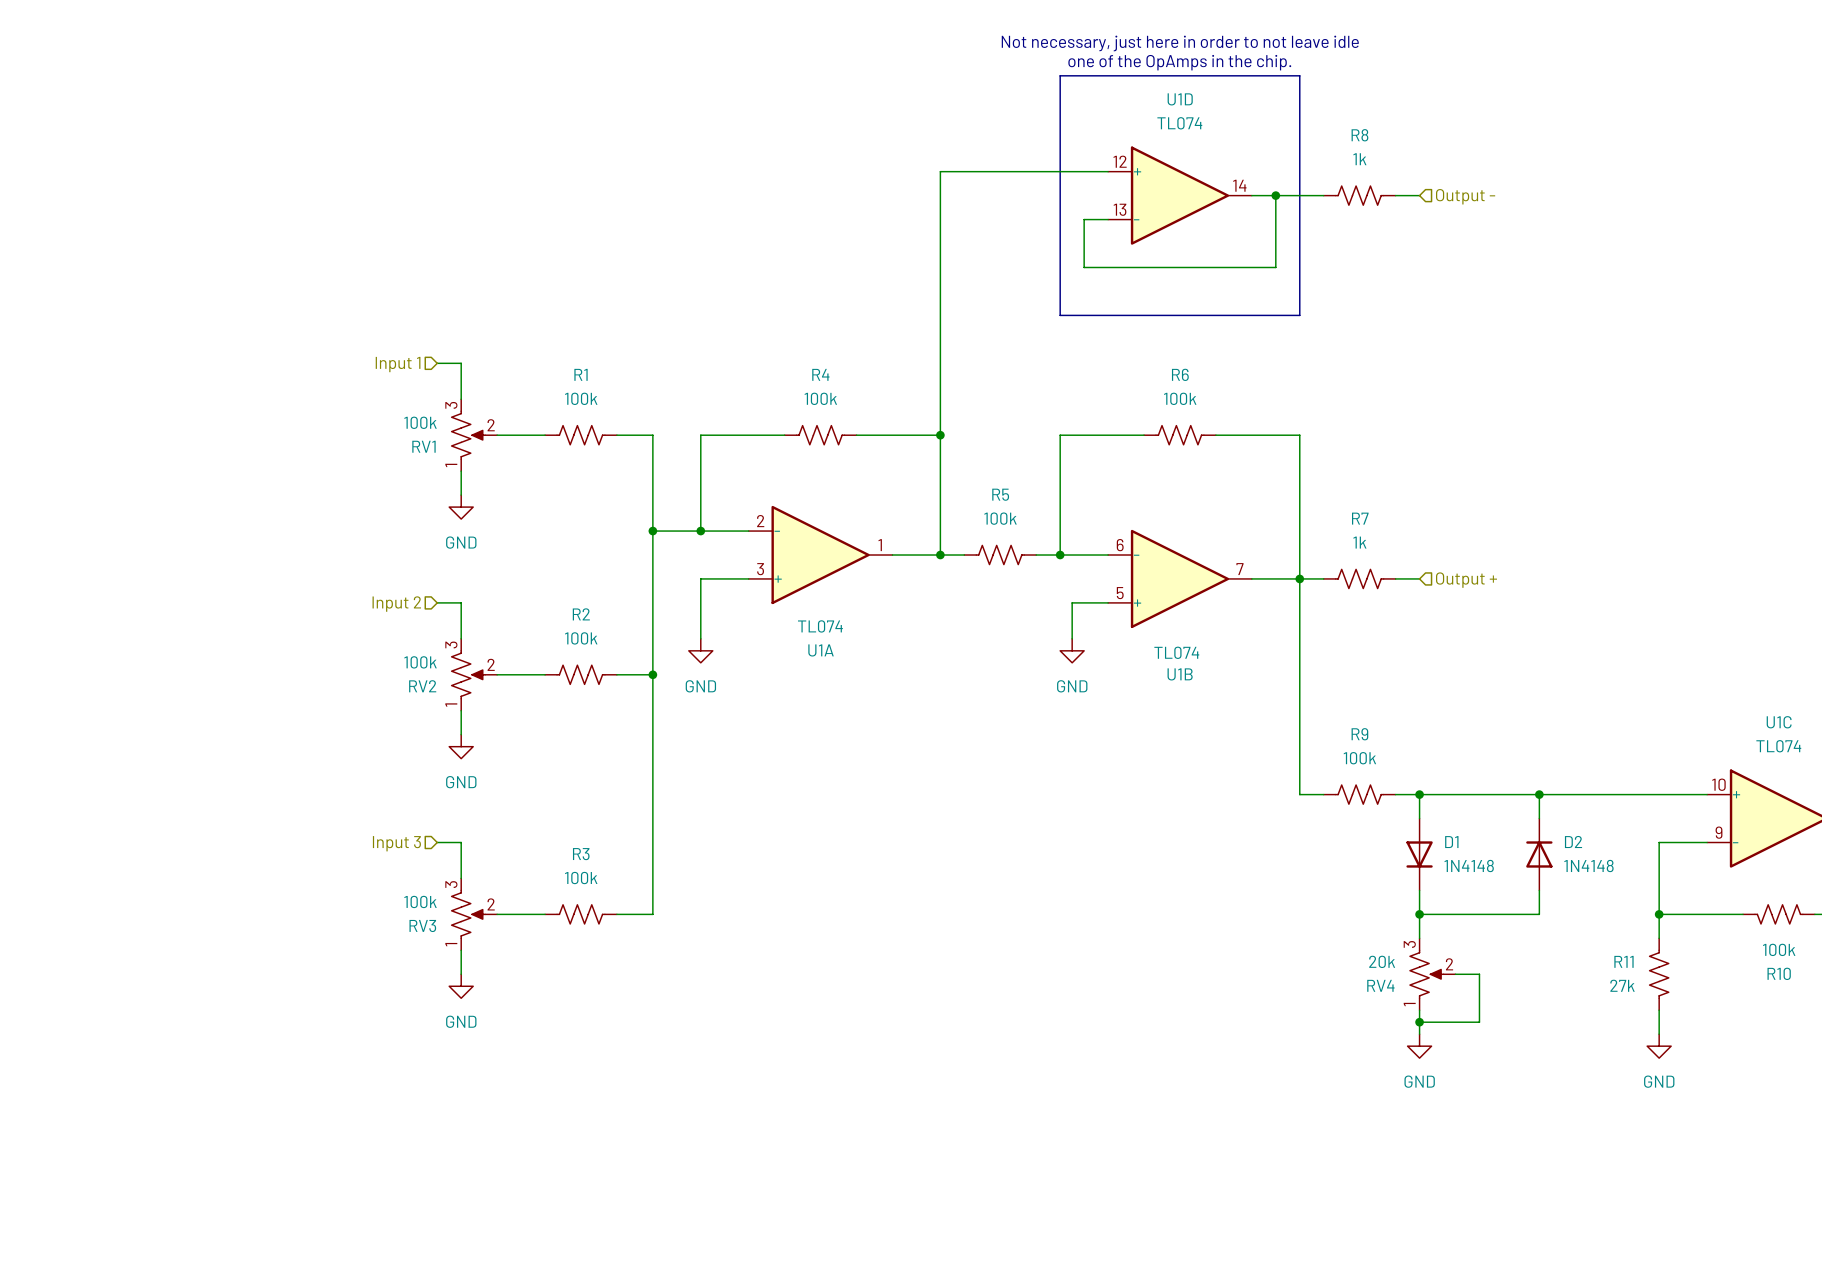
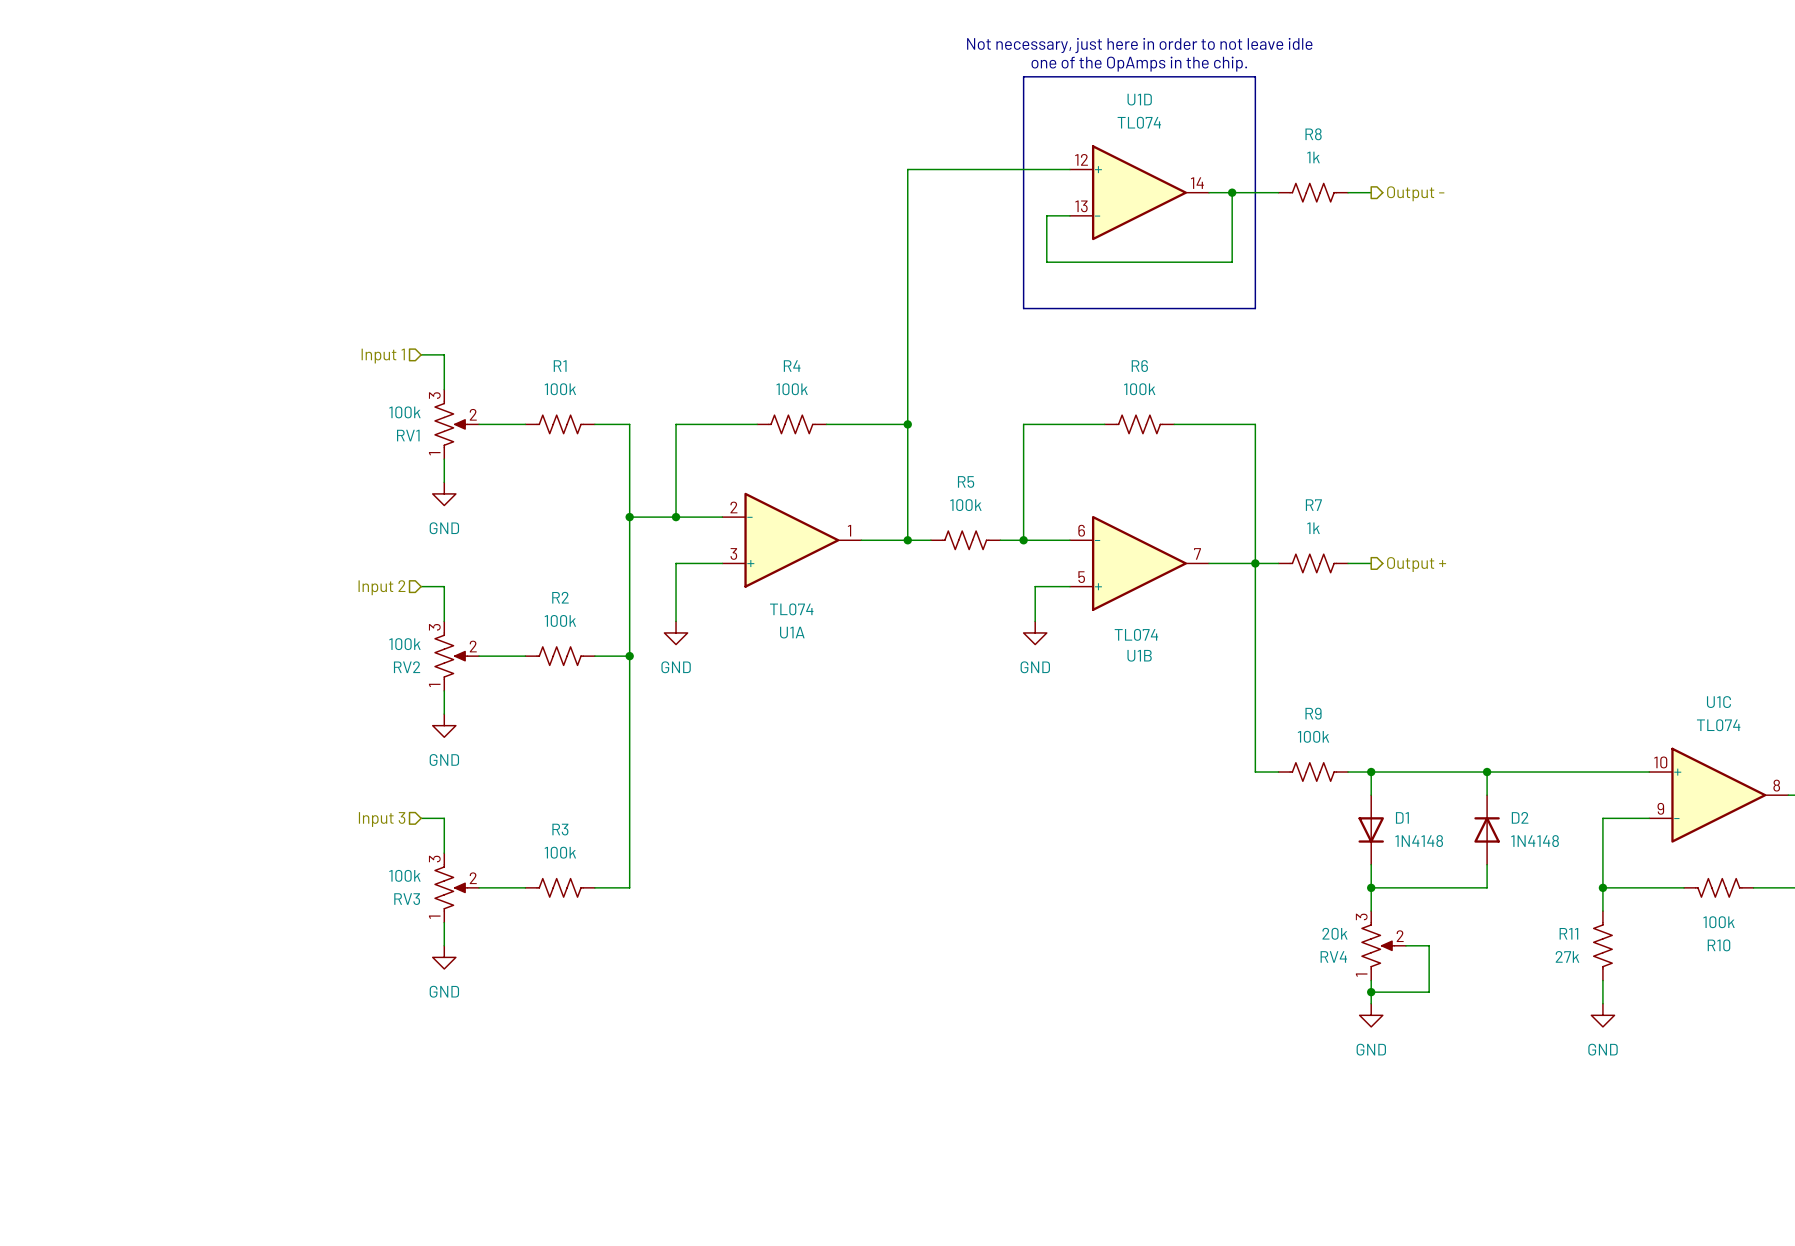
hierarchical label shape: input (1465, 196) -> output (1415, 193)
hierarchical label shape: input (1466, 580) -> output (1416, 564)

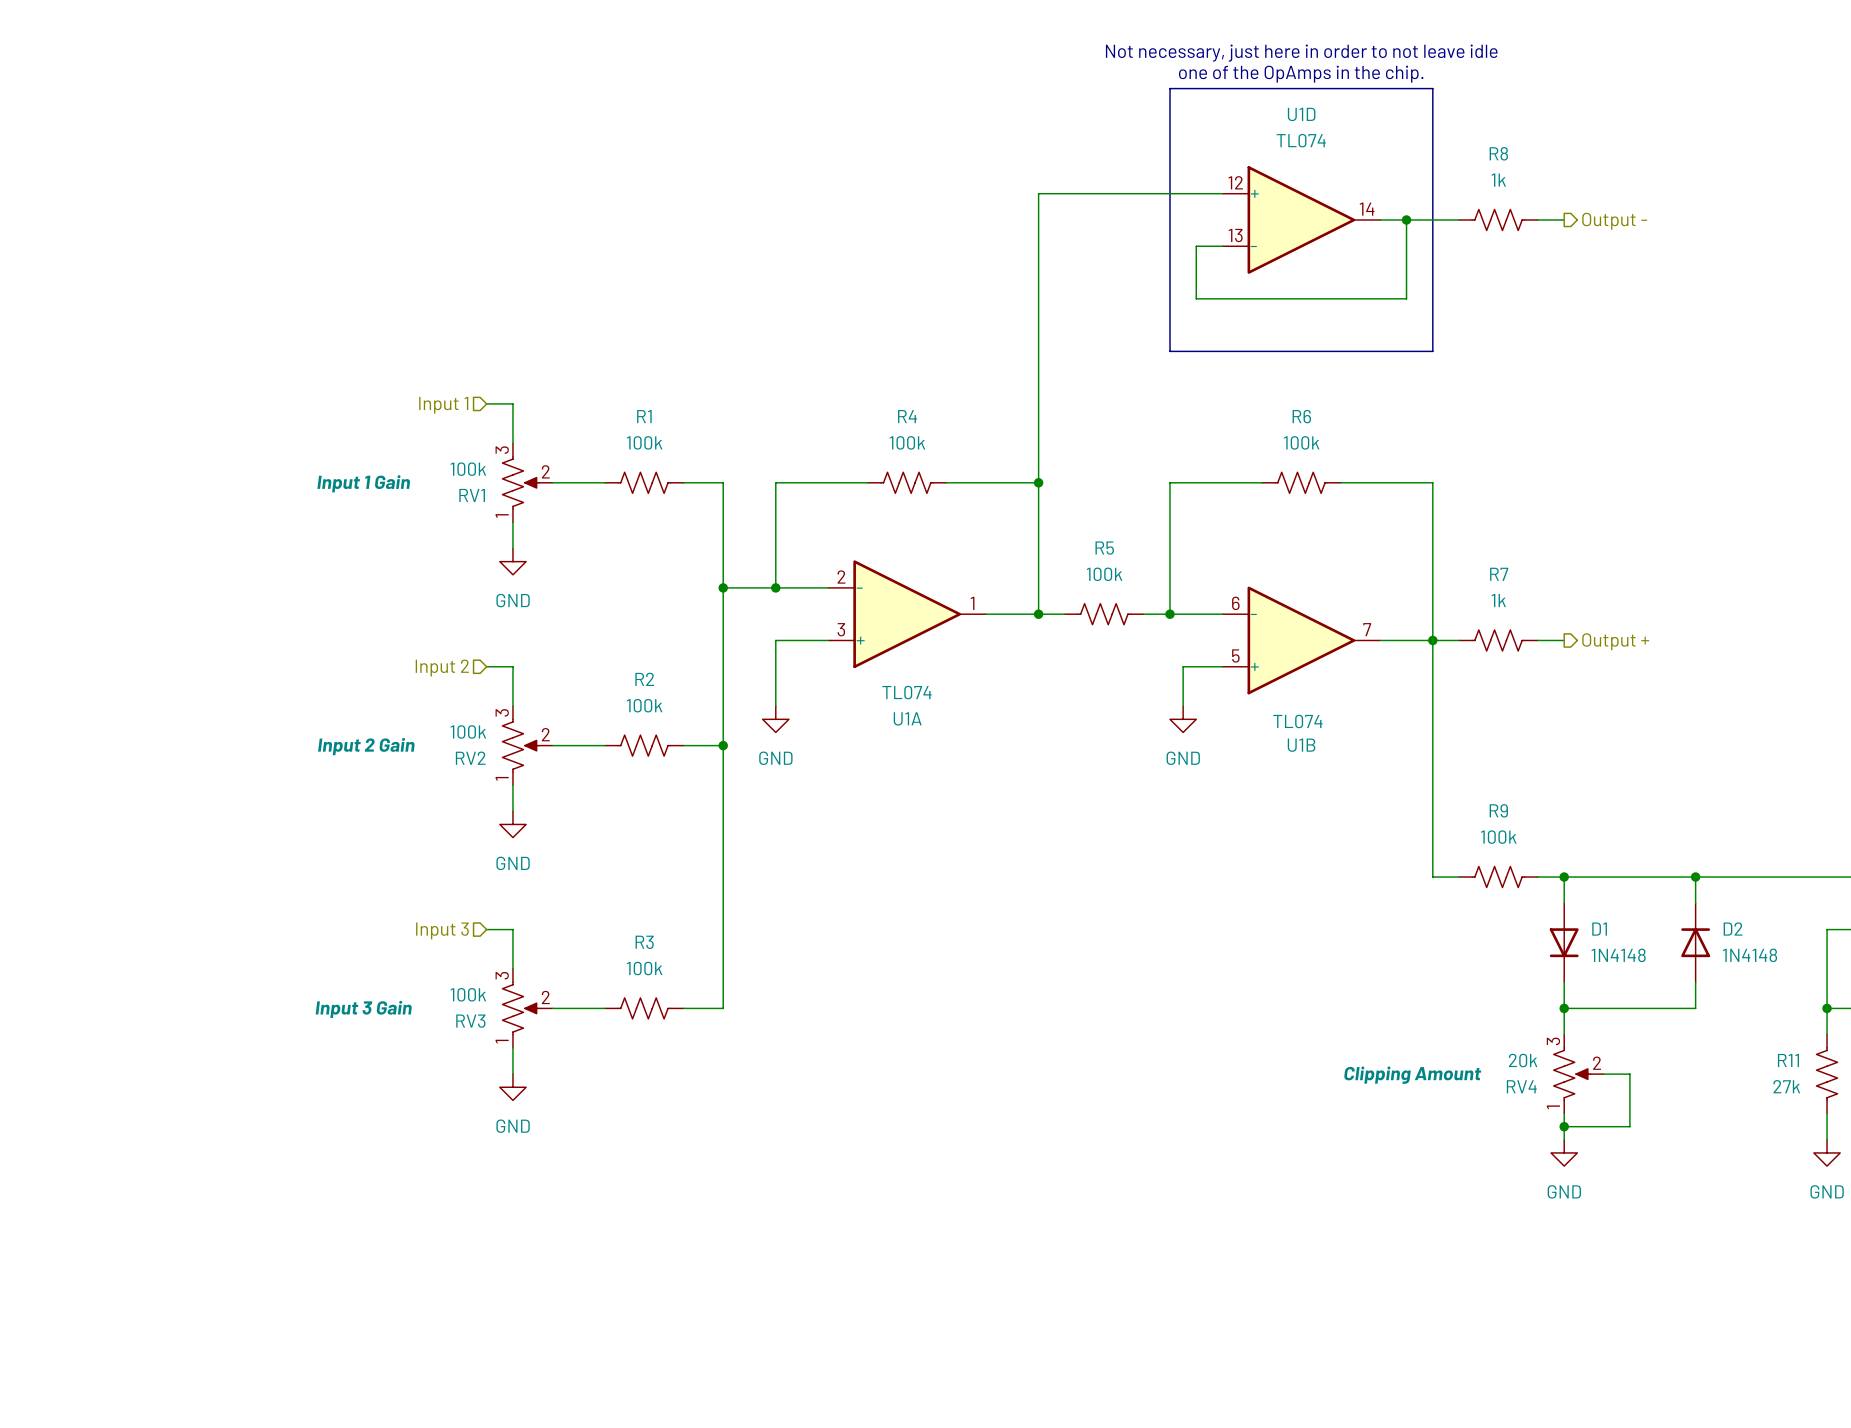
RV1 text: none -> Input 1 Gain (363, 483)
RV2 text: none -> Input 2 Gain (366, 746)
RV3 text: none -> Input 3 Gain (363, 1009)
RV4 text: none -> Clipping Amount (1412, 1075)

